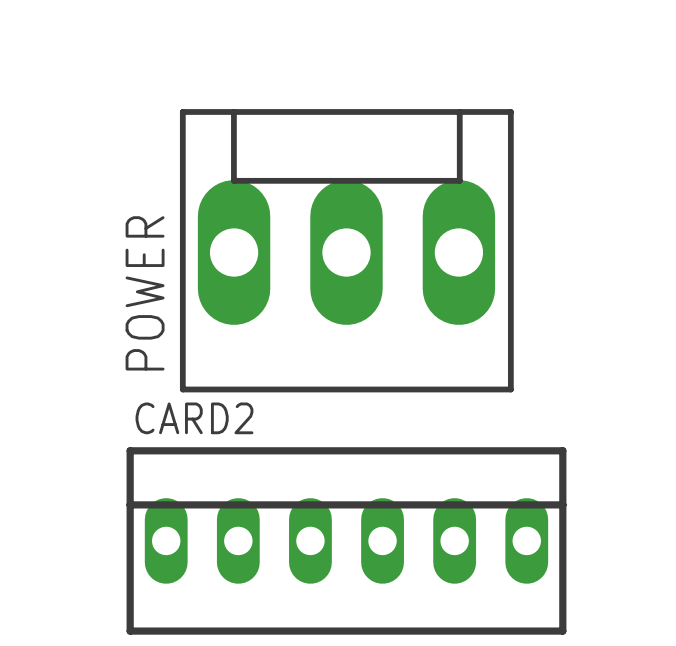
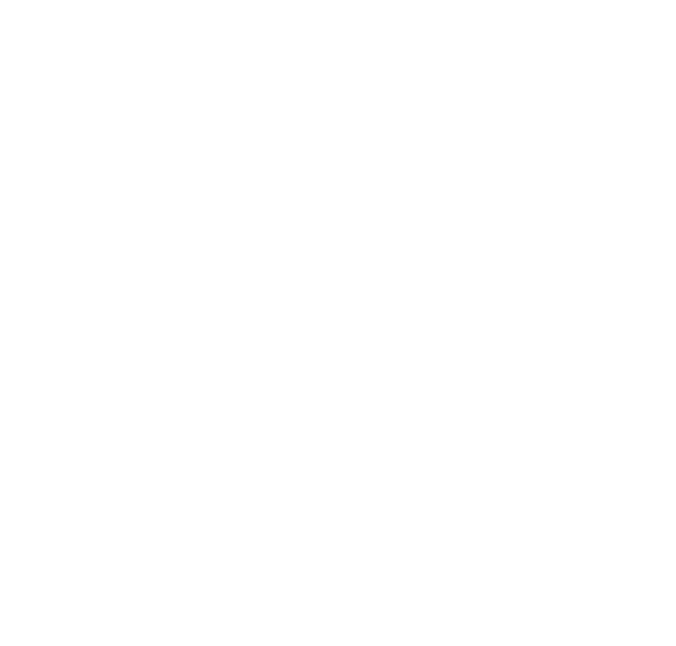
POWER: (346, 250) -> none
CARD2: (346, 540) -> none

